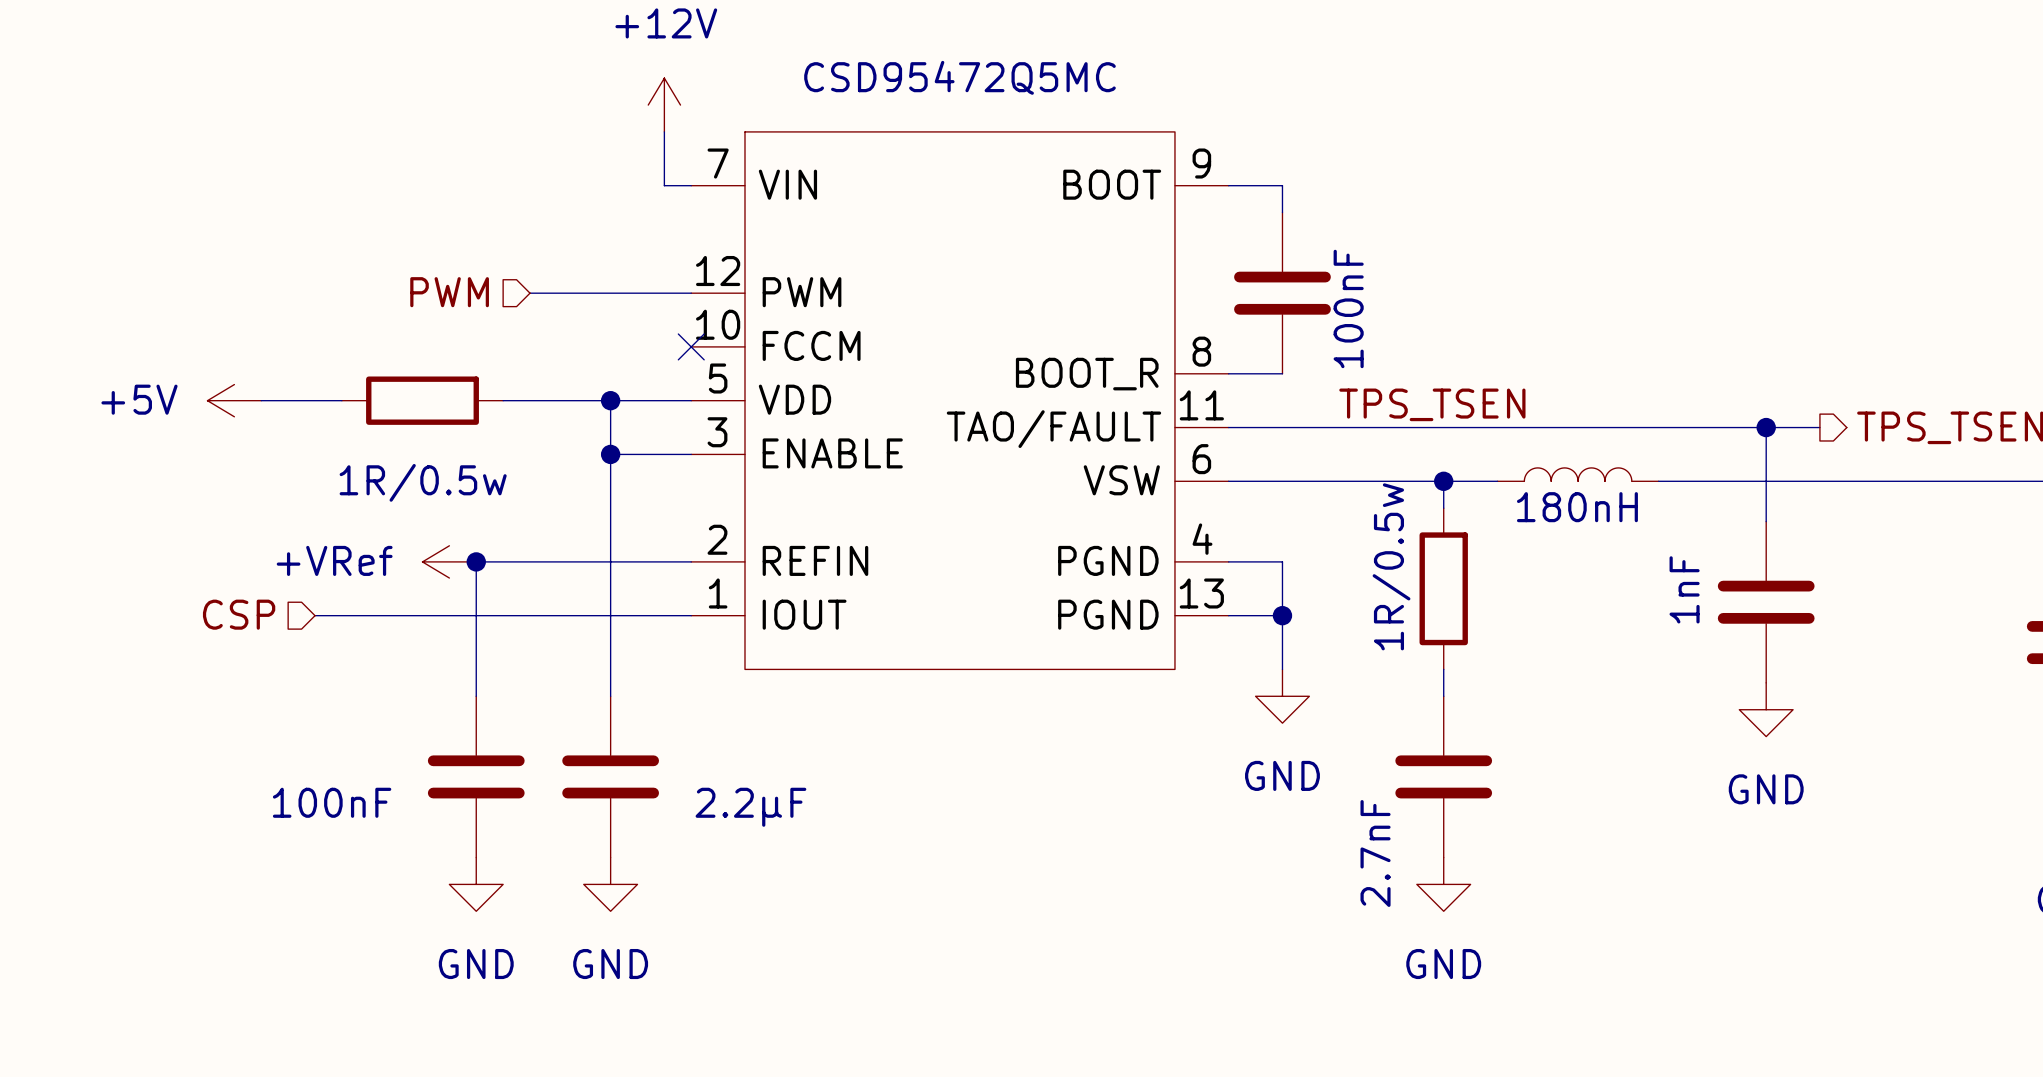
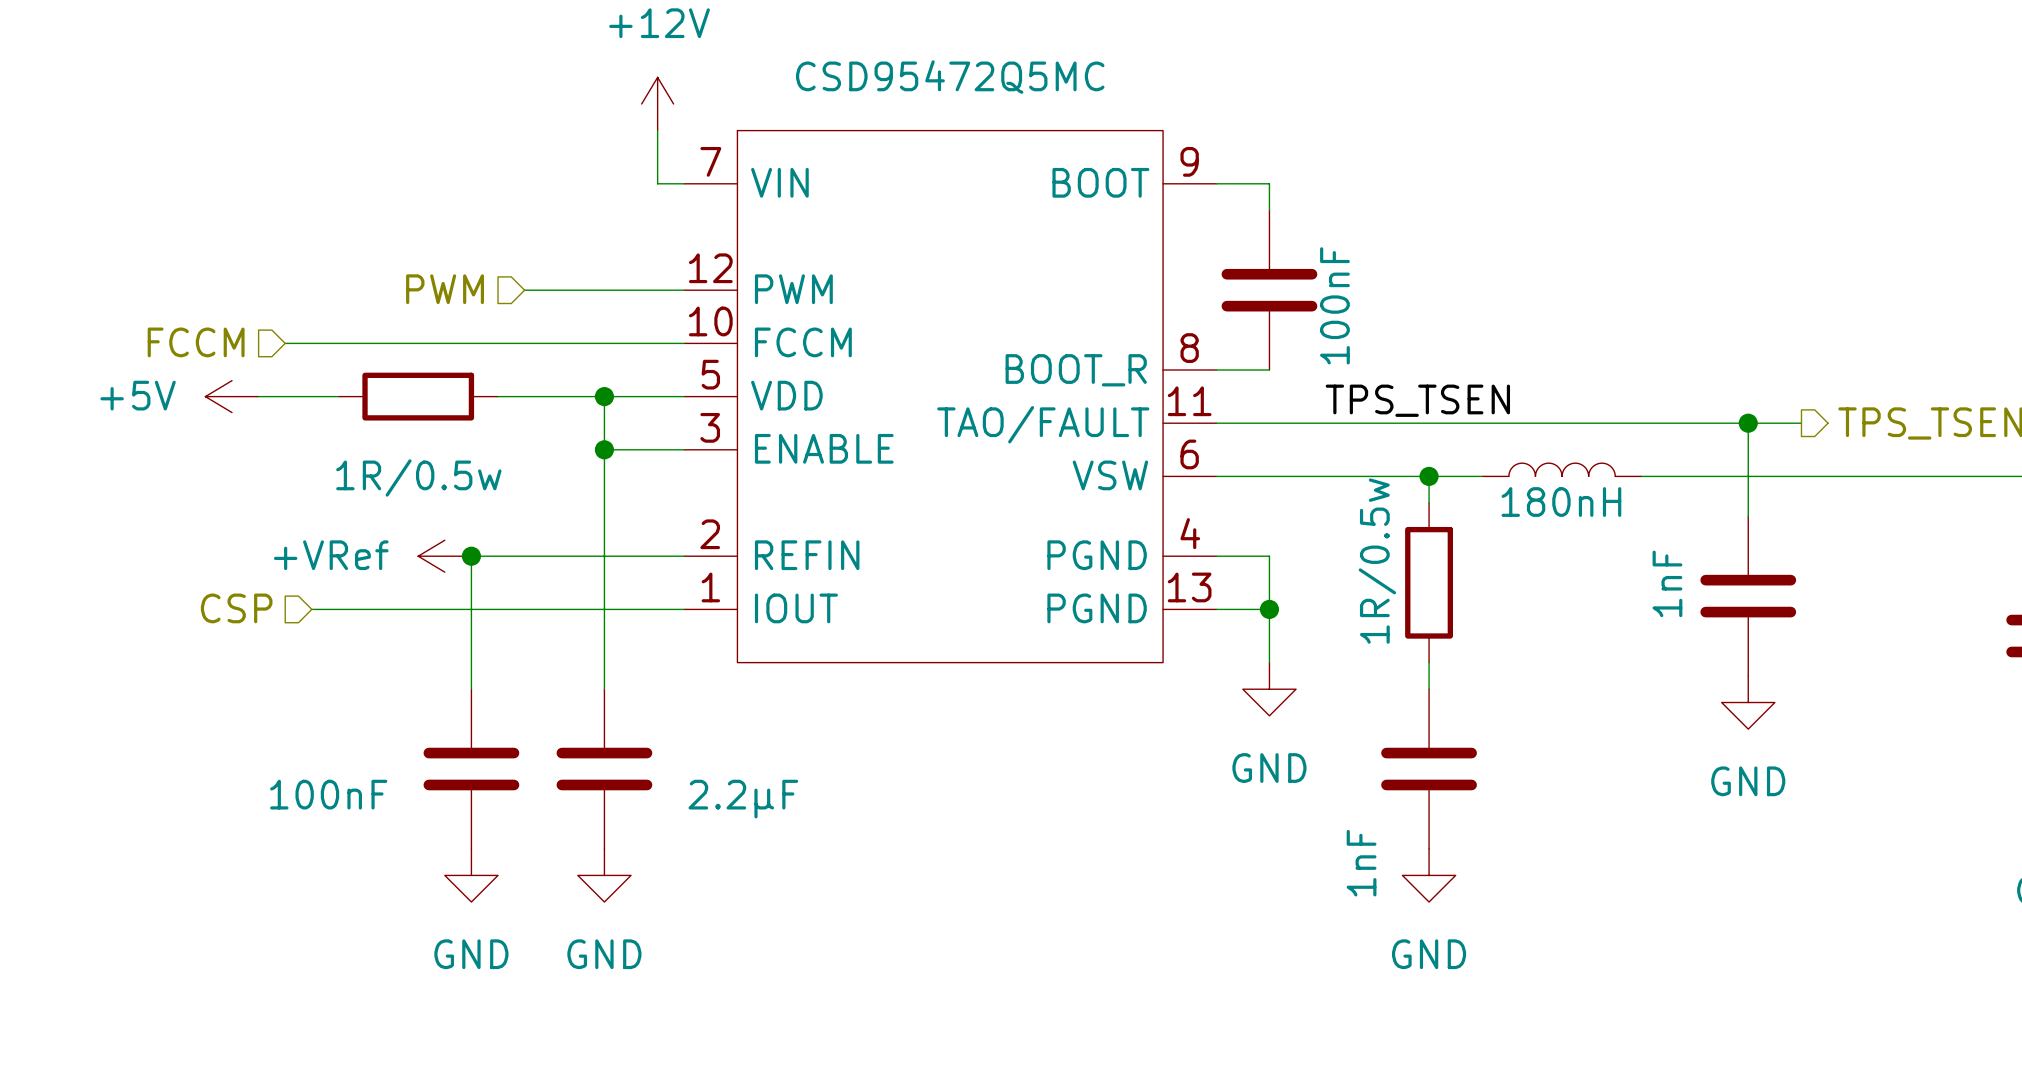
hierarchical label: none -> FCCM (196, 342)
wire: none -> (285, 343) (684, 343)
no-connect mark: (691, 346) -> none
part value: 2.7nF (1375, 853) -> 1nF (1361, 863)

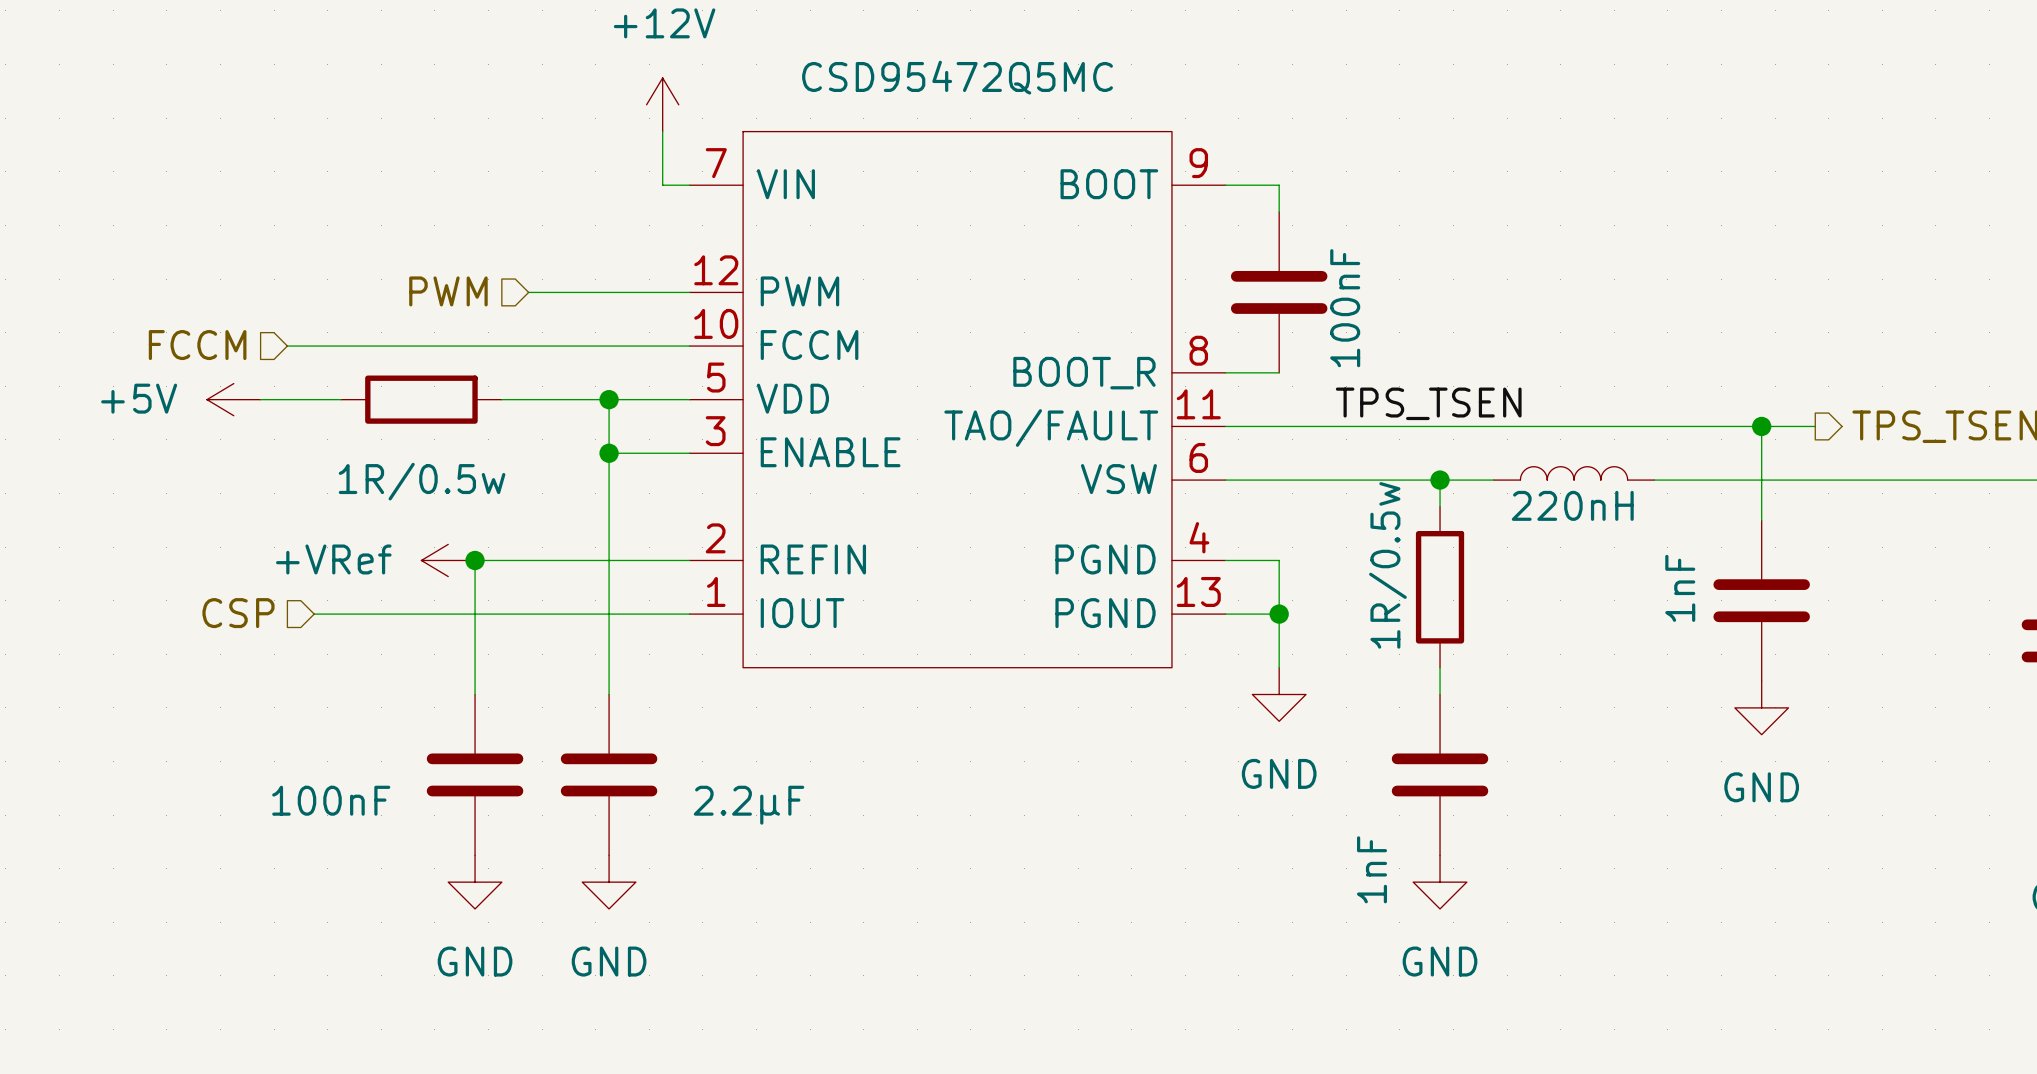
part value: 180nH (1561, 502) -> 220nH (1572, 505)

